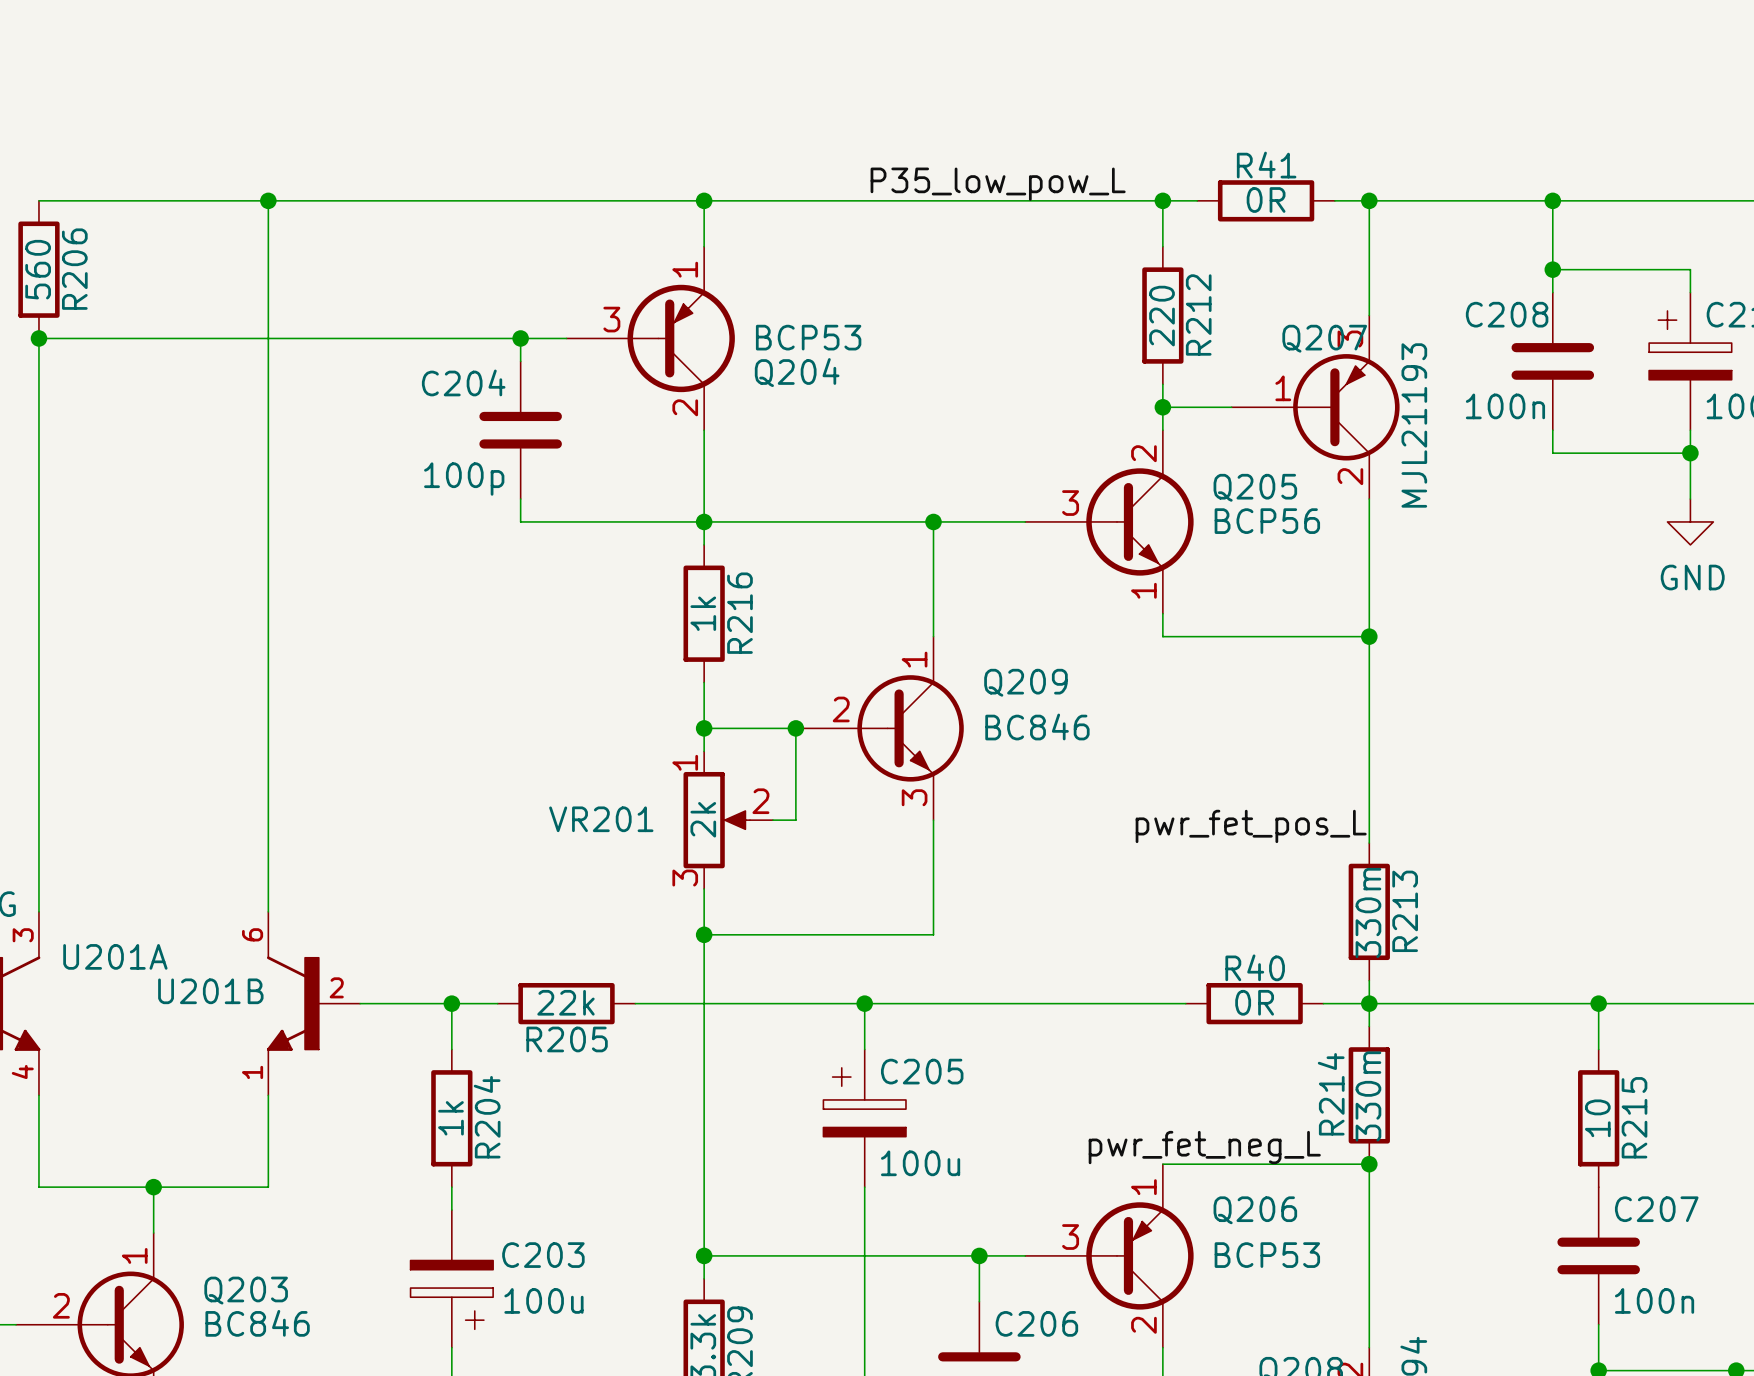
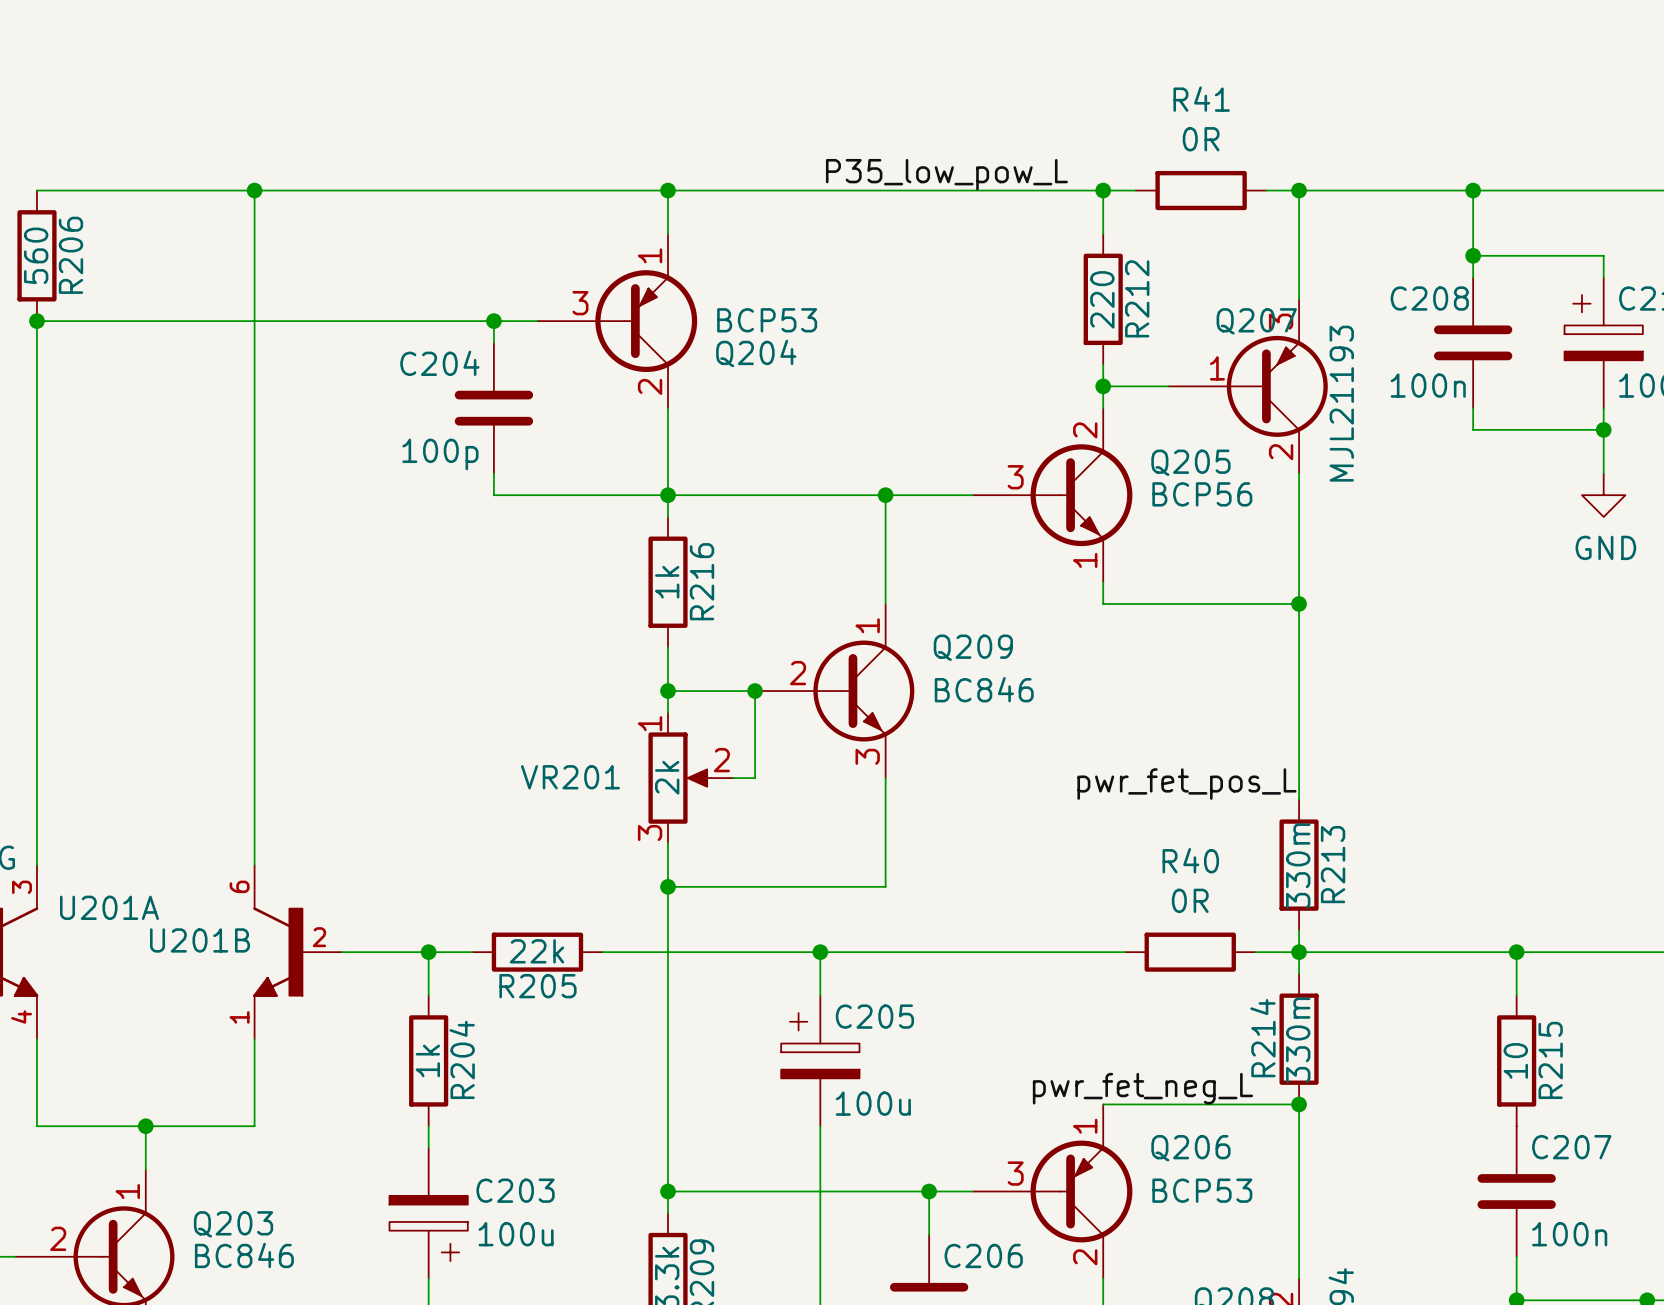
R41 name position: R41 (1266, 165) -> R41 (1201, 99)
R41 value position: 0R (1266, 199) -> 0R (1201, 139)
R40 name position: R40 (1255, 967) -> R40 (1190, 860)
R40 value position: 0R (1254, 1002) -> 0R (1190, 900)

